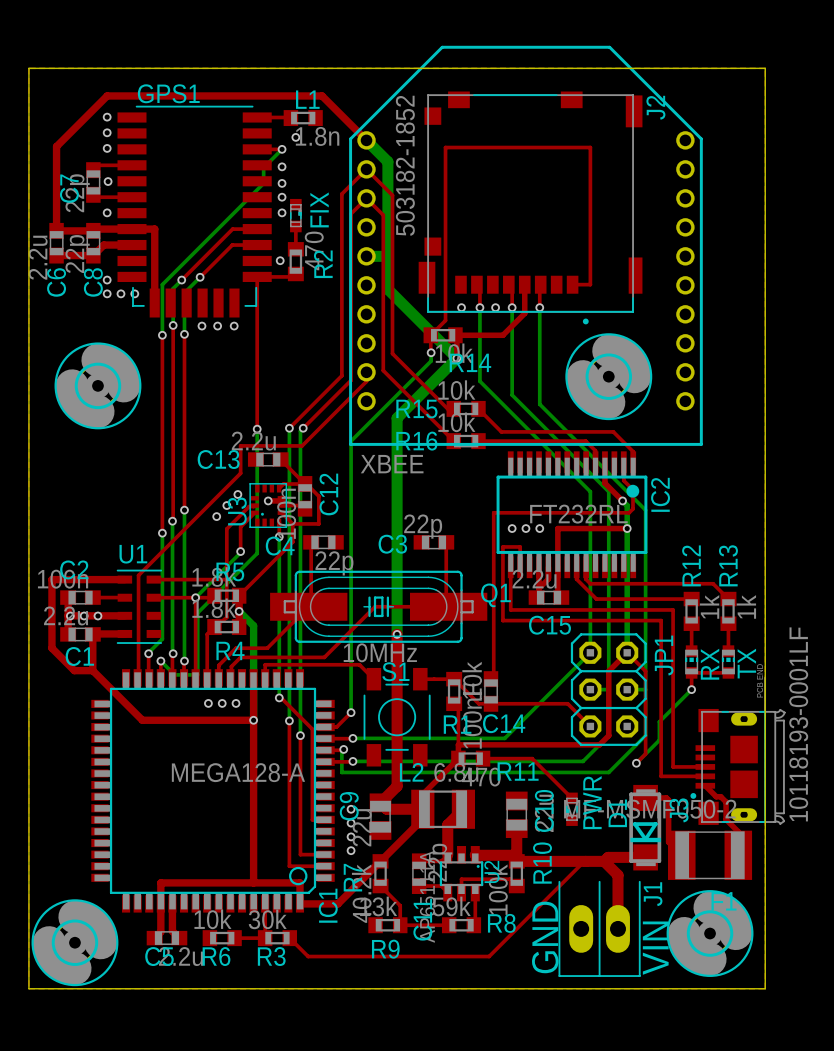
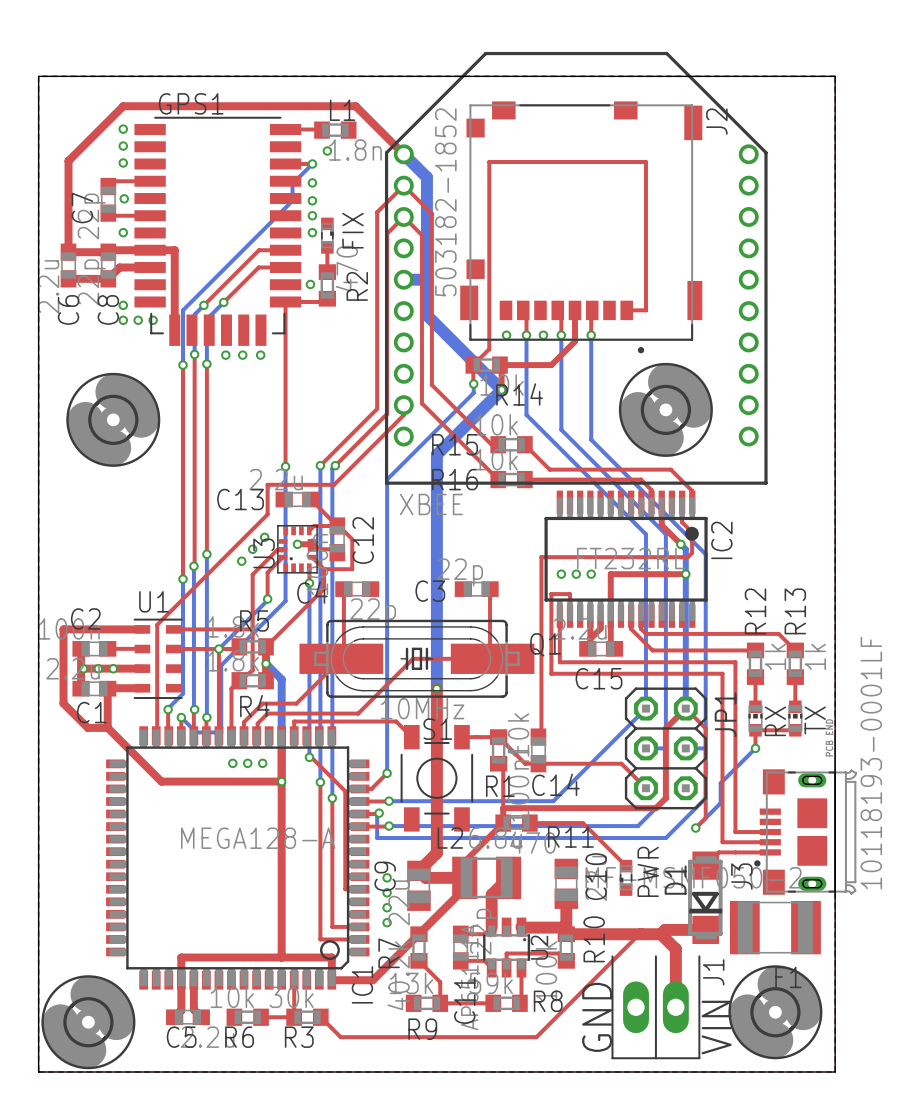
top track: (705, 785) (716, 796) (720, 796) (726, 802) (726, 819) (738, 831) (738, 855) -> none
top track: (645, 797) (666, 797) (668, 800) (668, 842) (681, 855) -> (705, 865) (718, 852) (770, 852)

